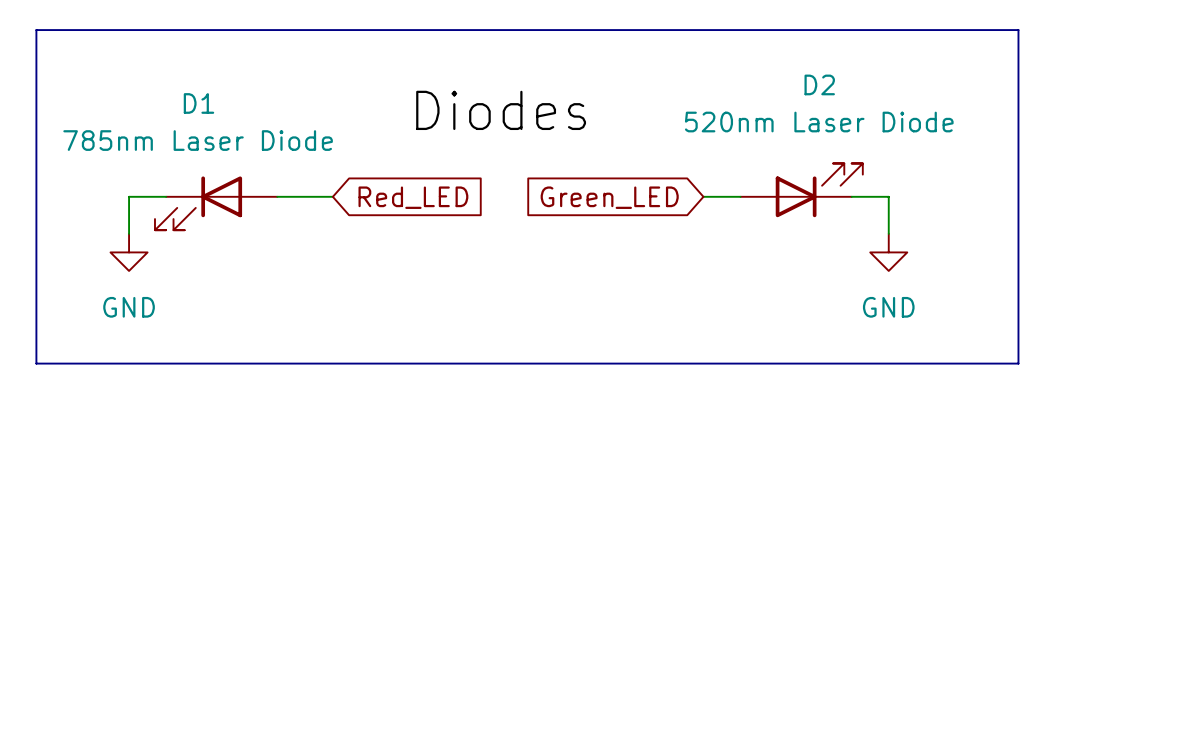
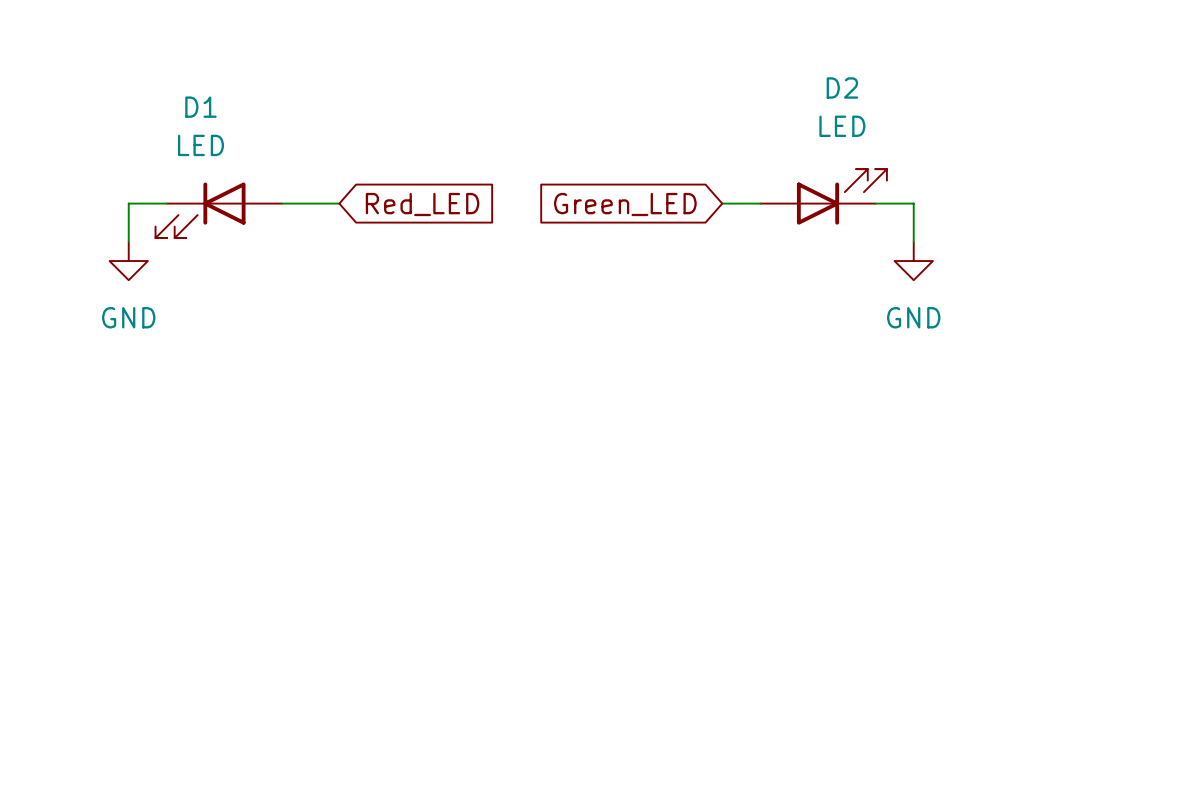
line: (36, 30) (36, 363) (1018, 363) (1018, 30) (36, 30) -> none
label: Diodes (501, 110) -> none
D2 value: 520nm Laser Diode (819, 122) -> LED (842, 126)
D1 value: 785nm Laser Diode (198, 140) -> LED (200, 145)

